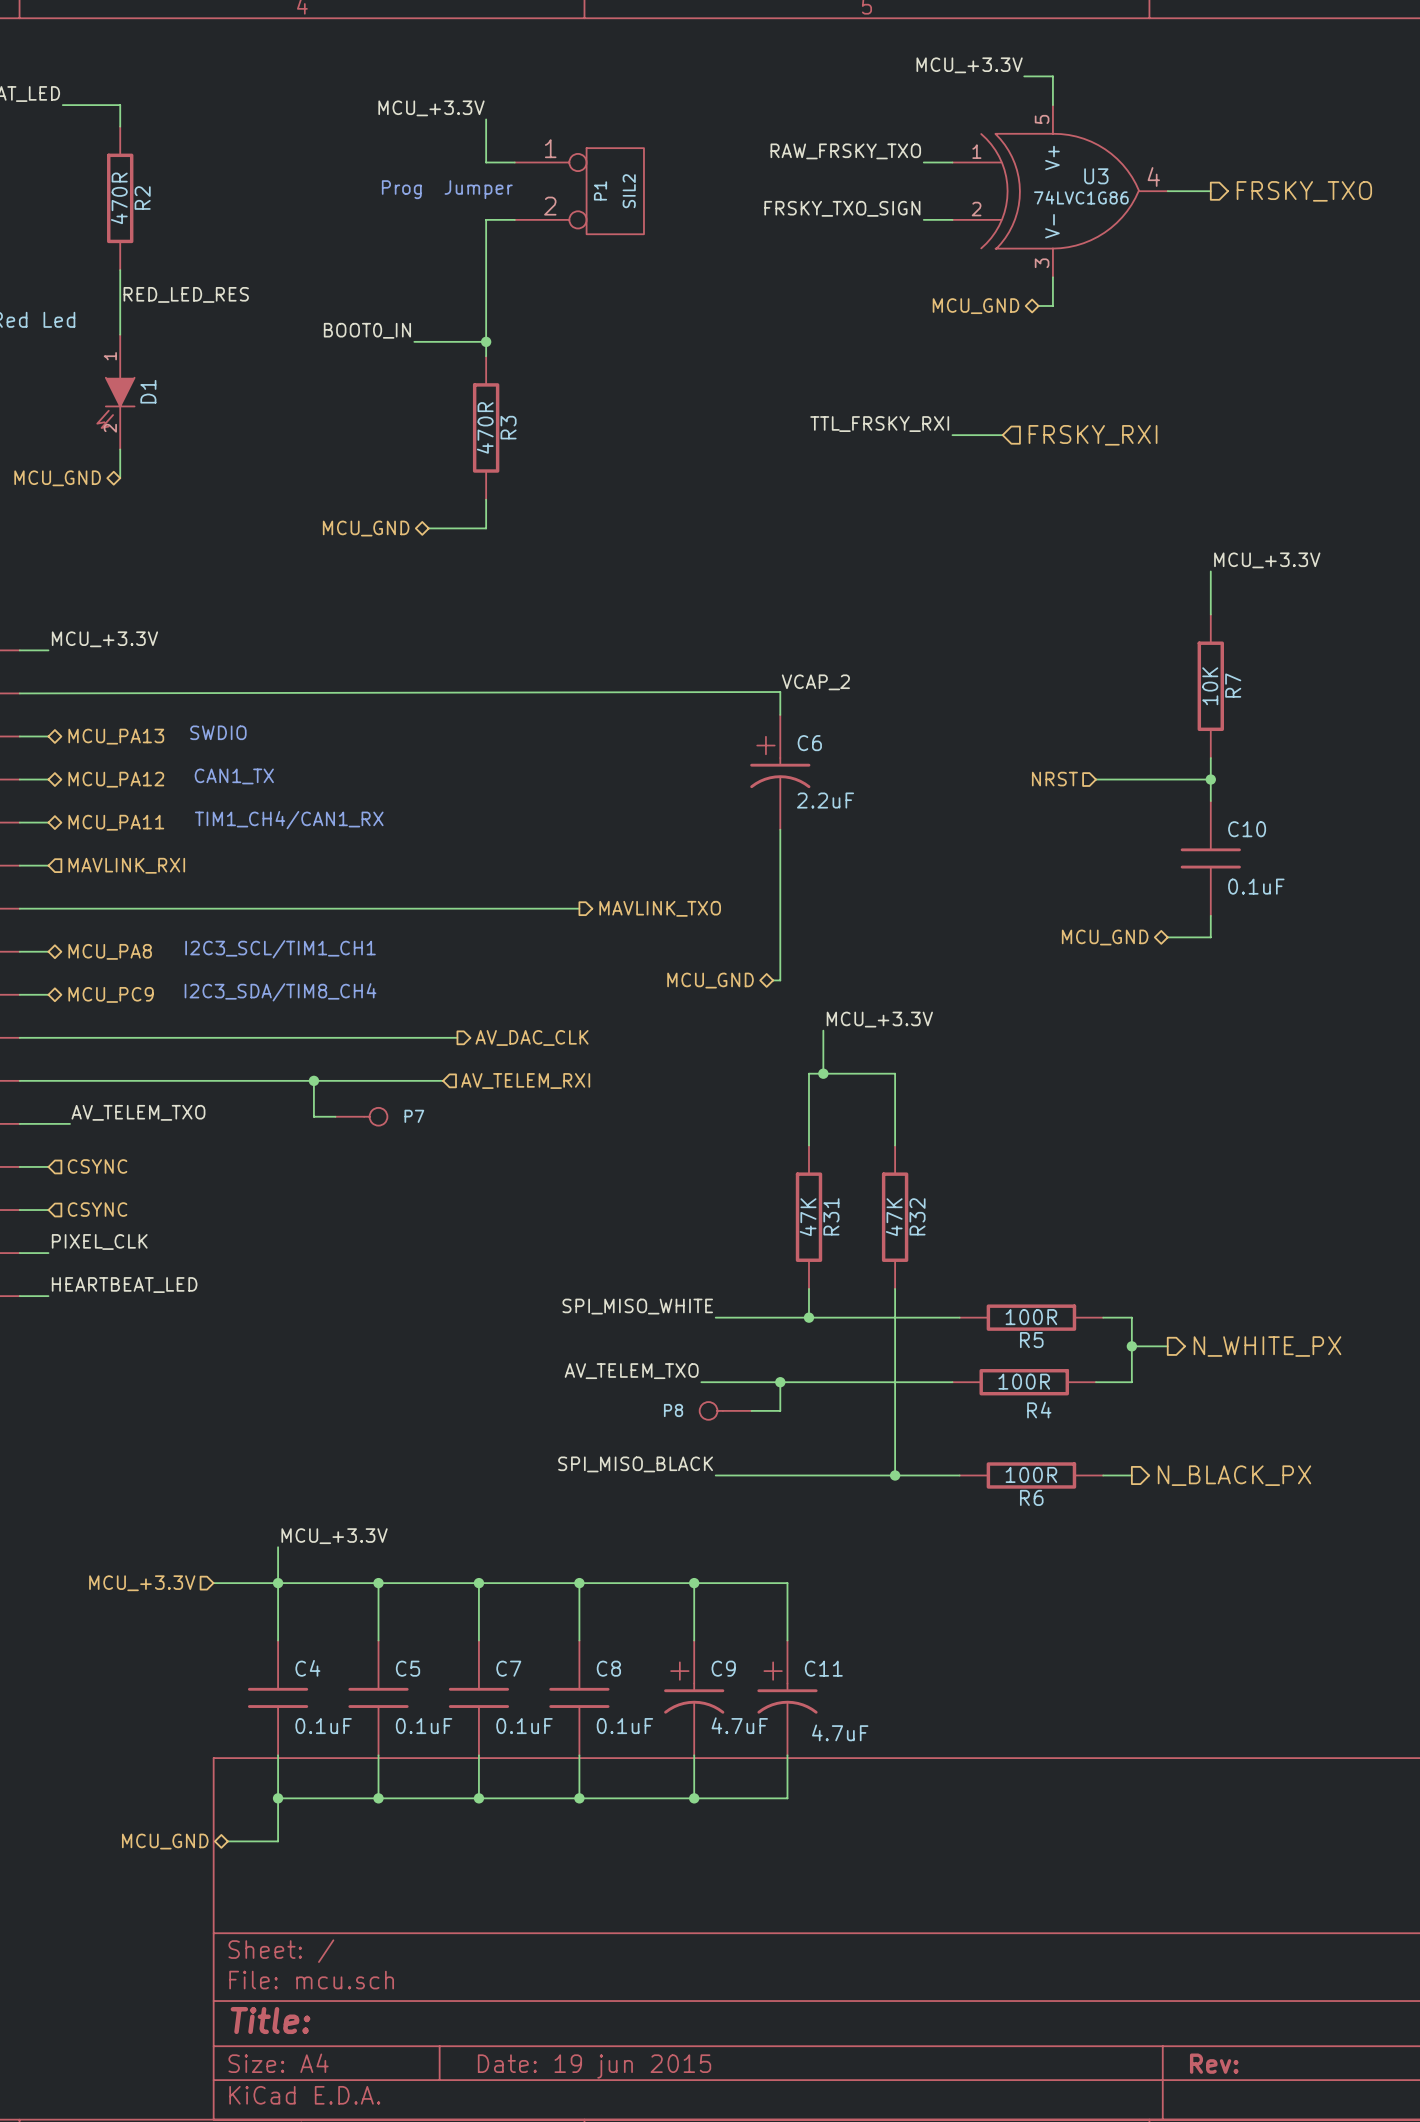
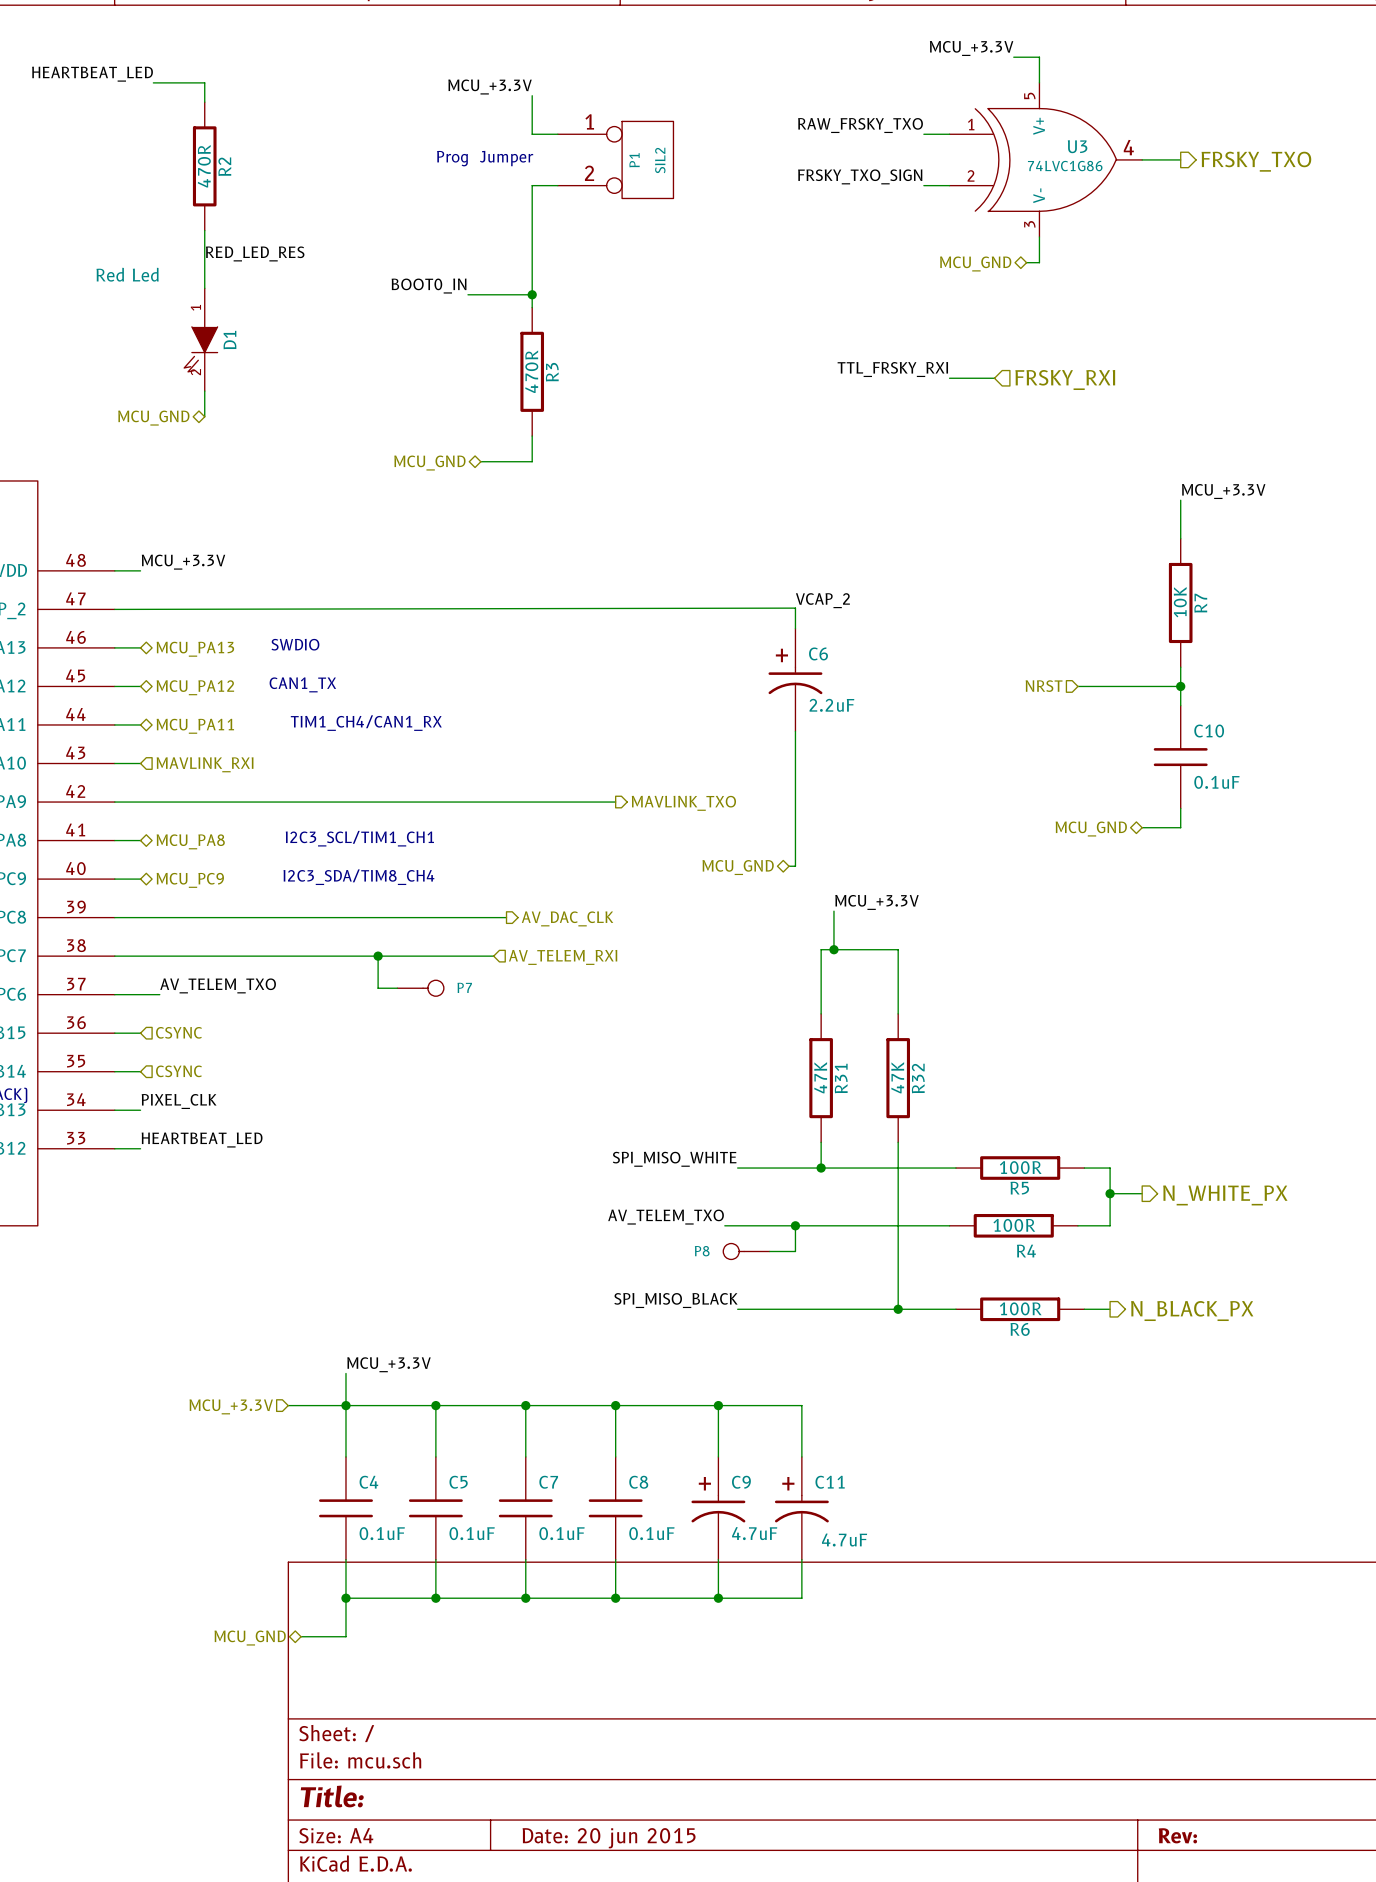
title block: Date: 19 jun 2015 (594, 2066) -> Date: 20 jun 2015 (609, 1838)

